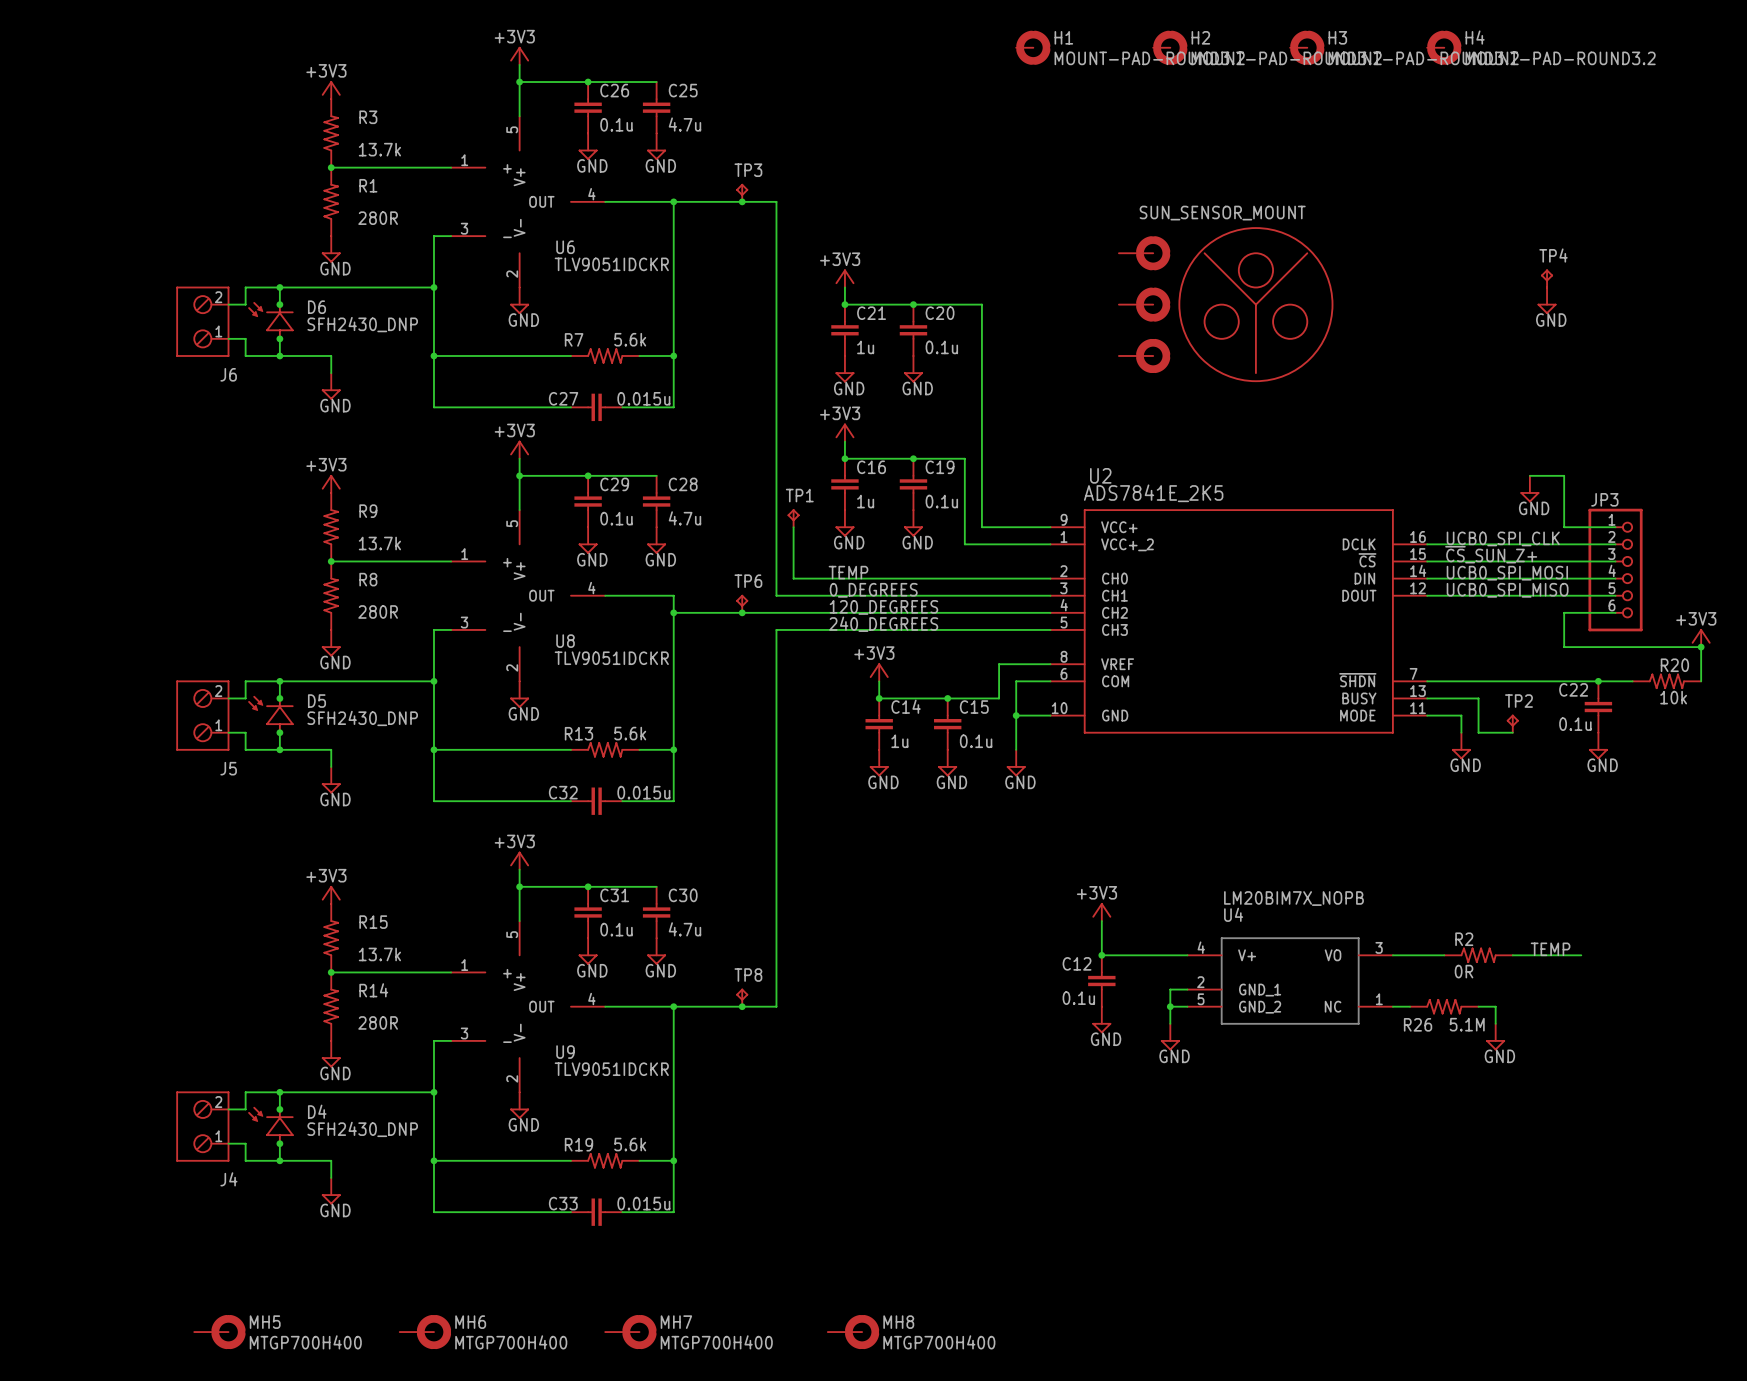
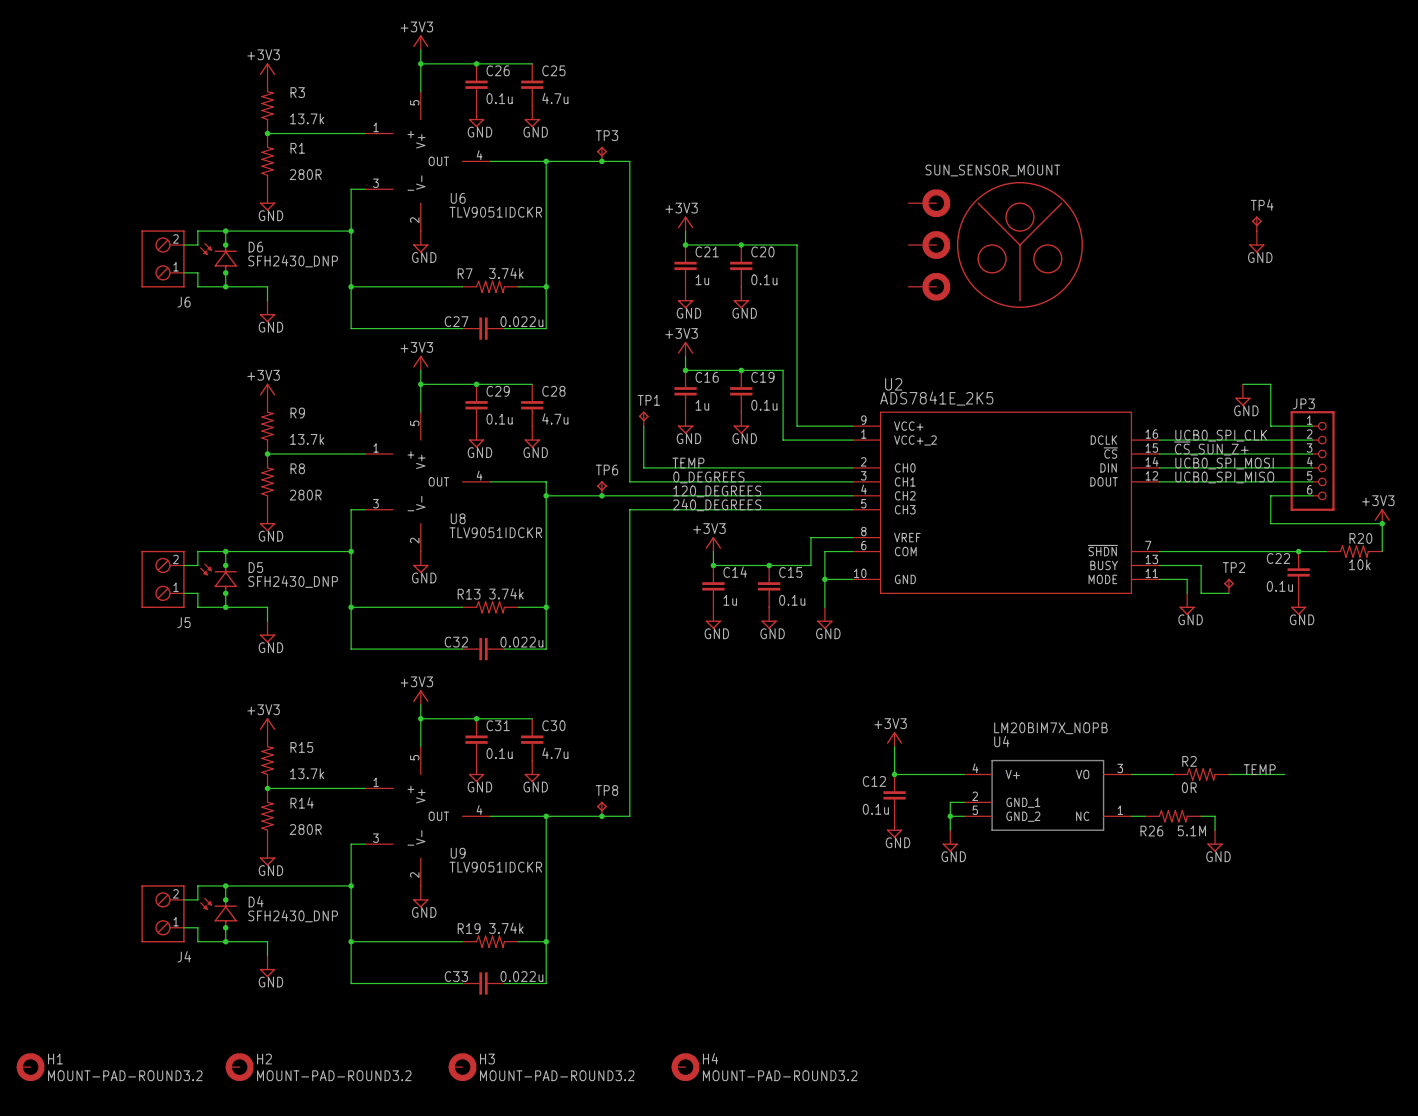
H1 position: (1033, 47) -> (30, 1067)
H2 position: (1170, 47) -> (239, 1067)
H3 position: (1307, 47) -> (462, 1067)
H4 position: (1444, 47) -> (685, 1067)
R7 value: 5.6k (630, 339) -> 3.74k (506, 273)
C27 value: 0.015u (643, 398) -> 0.022u (521, 321)
R13 value: 5.6k (630, 733) -> 3.74k (506, 593)
C32 value: 0.015u (643, 792) -> 0.022u (521, 642)
R19 value: 5.6k (630, 1144) -> 3.74k (506, 928)
C33 value: 0.015u (643, 1203) -> 0.022u (521, 976)
MH5: MTGP700H400 (219, 1332) -> none
MH6: MTGP700H400 (425, 1332) -> none
MH7: MTGP700H400 (630, 1332) -> none
MH8: MTGP700H400 (853, 1332) -> none

